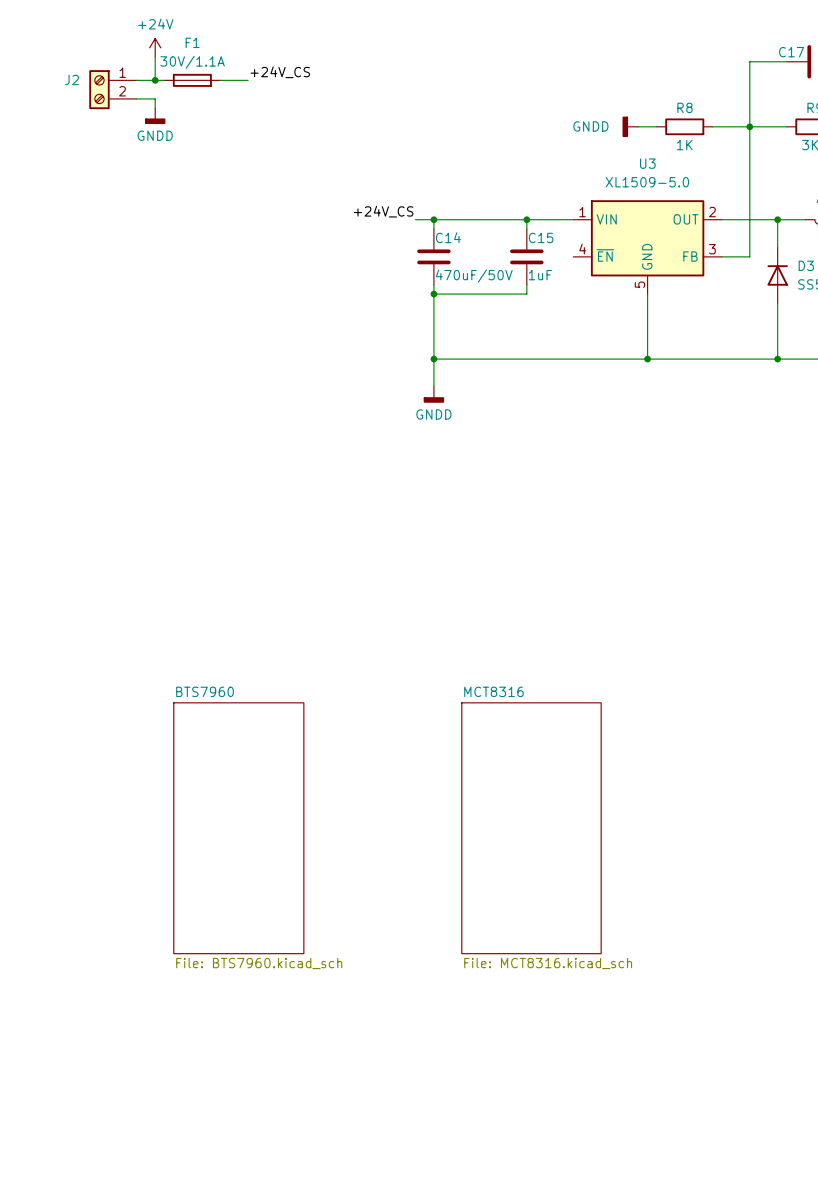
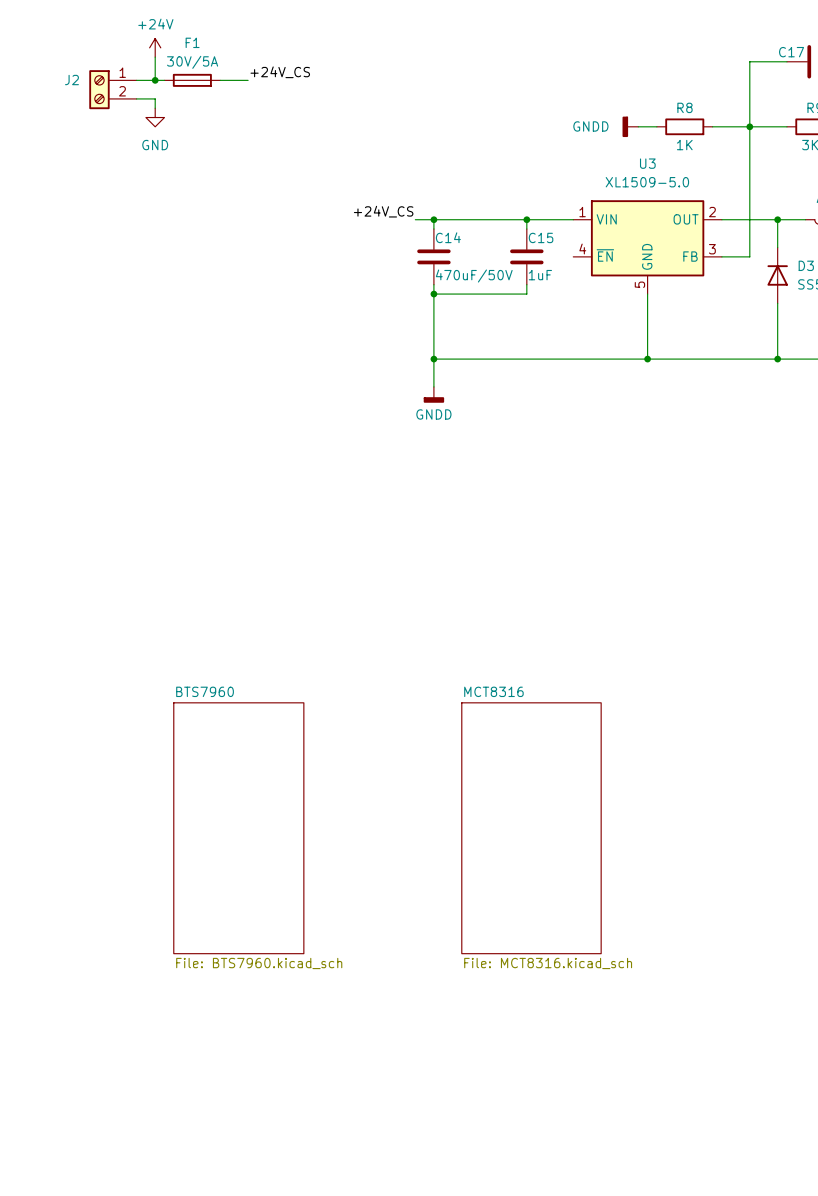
F1 value: 30V/1.1A (192, 62) -> 30V/5A (192, 62)
power symbol: GNDD (155, 116) -> GND (155, 117)

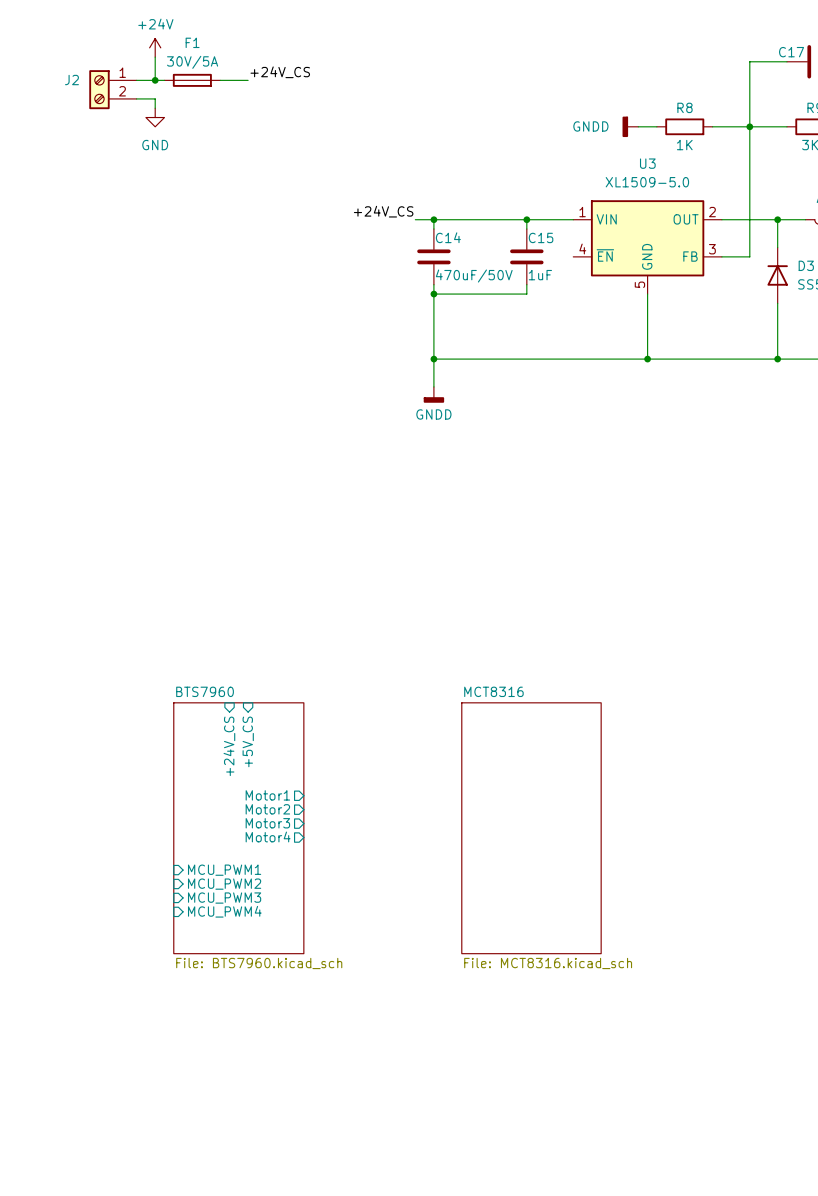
sheet pin: none -> +5V_CS (248, 741)
sheet pin: none -> +24V_CS (229, 746)
sheet pin: none -> Motor1 (267, 795)
sheet pin: none -> Motor2 (267, 809)
sheet pin: none -> Motor3 (267, 823)
sheet pin: none -> Motor4 (268, 836)
sheet pin: none -> MCU_PWM1 (224, 870)
sheet pin: none -> MCU_PWM2 (224, 884)
sheet pin: none -> MCU_PWM3 (224, 898)
sheet pin: none -> MCU_PWM4 (224, 911)

